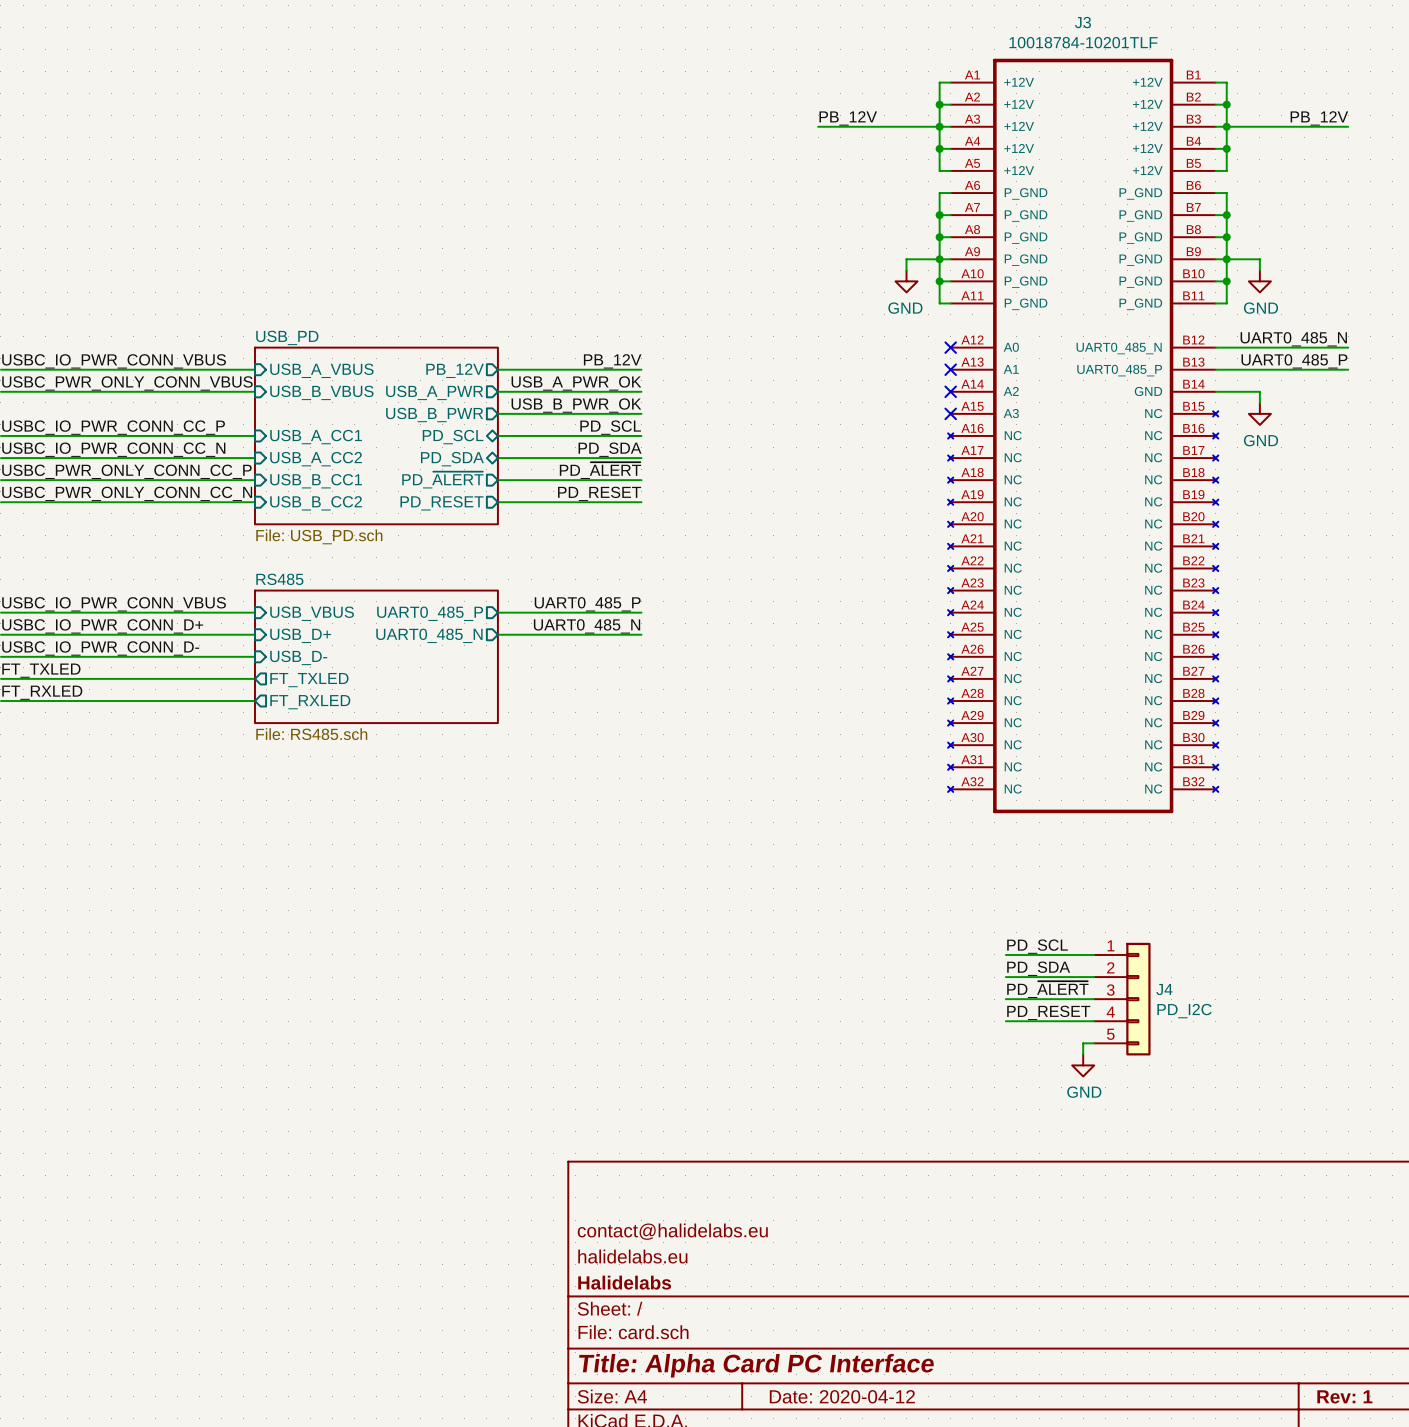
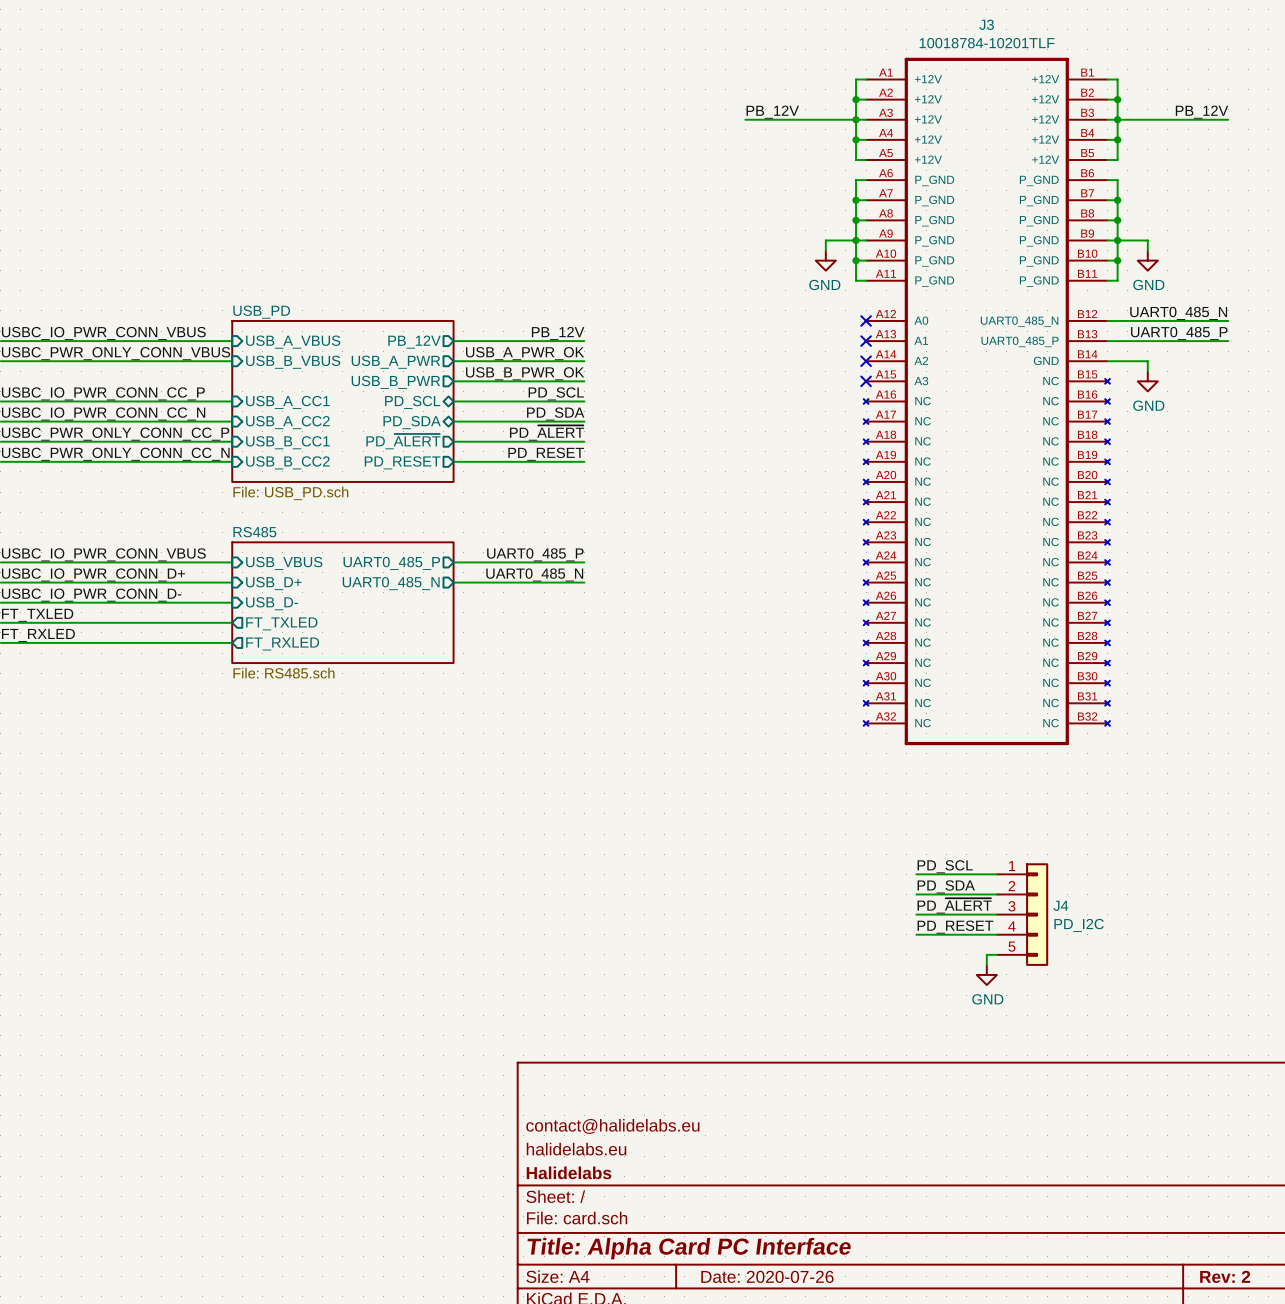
title block: Date: 2020-04-12 (842, 1396) -> Date: 2020-07-26 (767, 1276)
title block: Rev: 1 (1344, 1396) -> Rev: 2 (1225, 1276)

